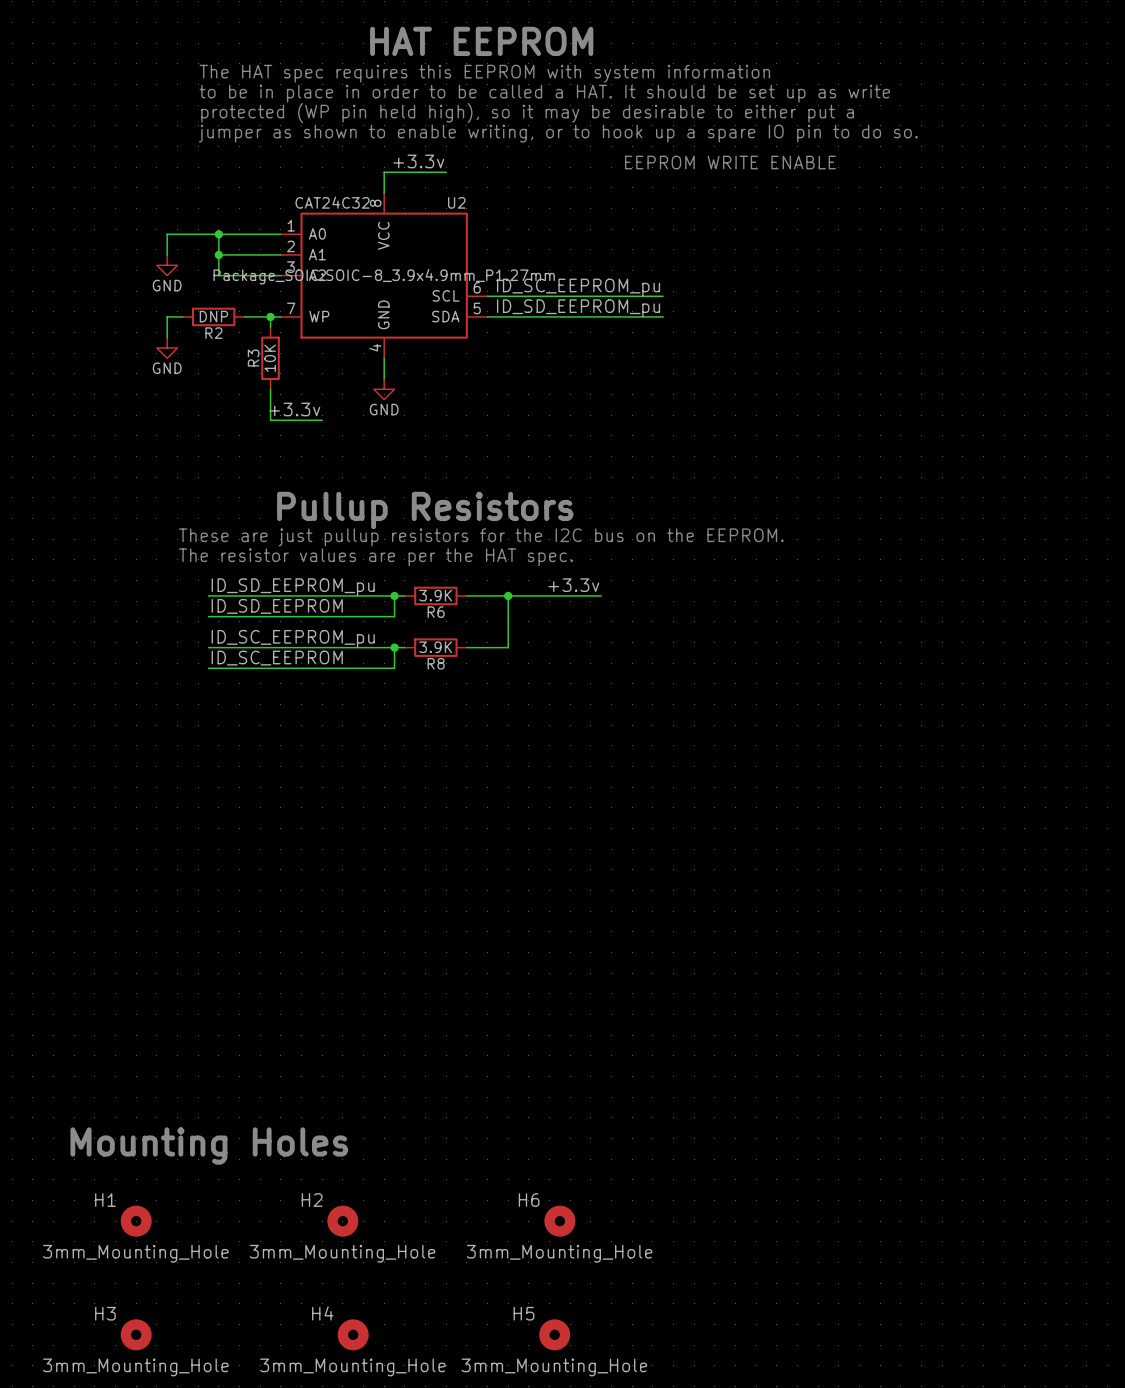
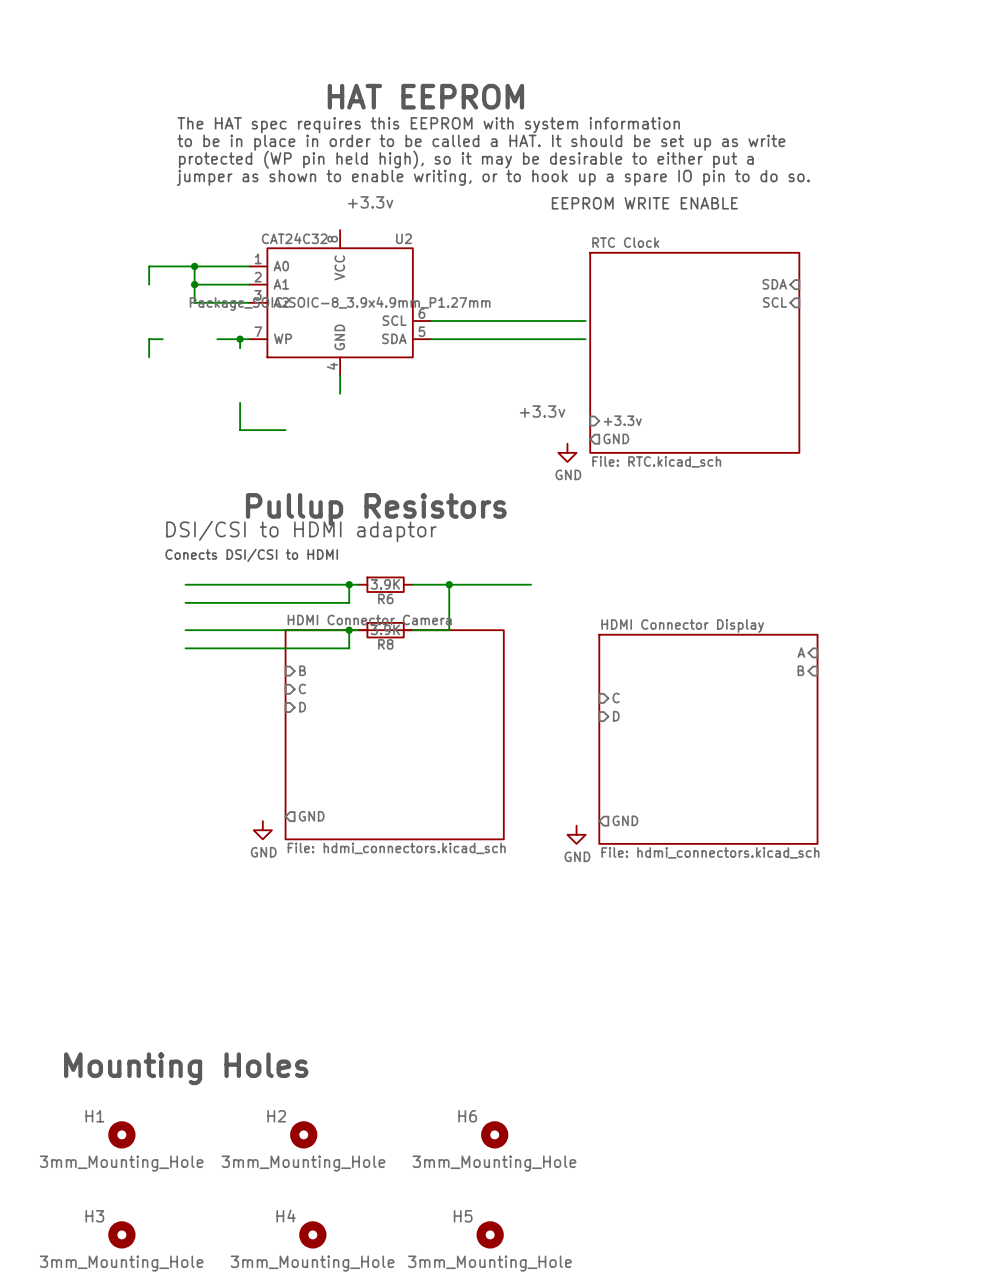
wire: (446, 172) (384, 172) (384, 192) -> none
sheet pin: none -> SDA (774, 284)
power symbol: GND (167, 265) -> none
sheet pin: none -> SCL (774, 302)
label: ID_SC_EEPROM_pu (578, 287) -> none
label: ID_SD_EEPROM_pu (578, 308) -> none
R2: DNP (213, 316) -> none
sheet RTC Clock: none -> File: RTC.kicad_sch (694, 352)
power symbol: GND (167, 347) -> none
R3: 10K (270, 358) -> none
power symbol: GND (384, 389) -> none
label: none -> +3.3v (542, 411)
label: +3.3v (294, 409) -> none
sheet pin: none -> +3.3v (622, 420)
sheet pin: none -> GND (616, 438)
power symbol: none -> GND (567, 452)
text: These are just pullup resistors for the I2C bus on the EEPROM. (481, 537) -> DSI/CSI to HDMI adaptor (301, 531)
text: The resistor values are per the HAT spec. (375, 557) -> none
text: none -> Conects DSI/CSI to HDMI (251, 555)
label: +3.3v (573, 585) -> none
label: ID_SD_EEPROM_pu (293, 587) -> none
label: ID_SD_EEPROM (277, 606) -> none
label: ID_SC_EEPROM_pu (293, 638) -> none
label: ID_SC_EEPROM (277, 658) -> none
sheet pin: none -> A (801, 652)
sheet pin: none -> B (302, 670)
sheet pin: none -> B (800, 670)
sheet pin: none -> C (302, 688)
sheet pin: none -> C (616, 698)
sheet pin: none -> D (302, 707)
sheet pin: none -> D (616, 716)
sheet HDMI Connector Camera: none -> File: hdmi_connectors.kicad_sch (394, 734)
sheet HDMI Connector Display: none -> File: hdmi_connectors.kicad_sch (708, 739)
sheet pin: none -> GND (311, 816)
sheet pin: none -> GND (625, 820)
power symbol: none -> GND (262, 830)
power symbol: none -> GND (576, 834)

